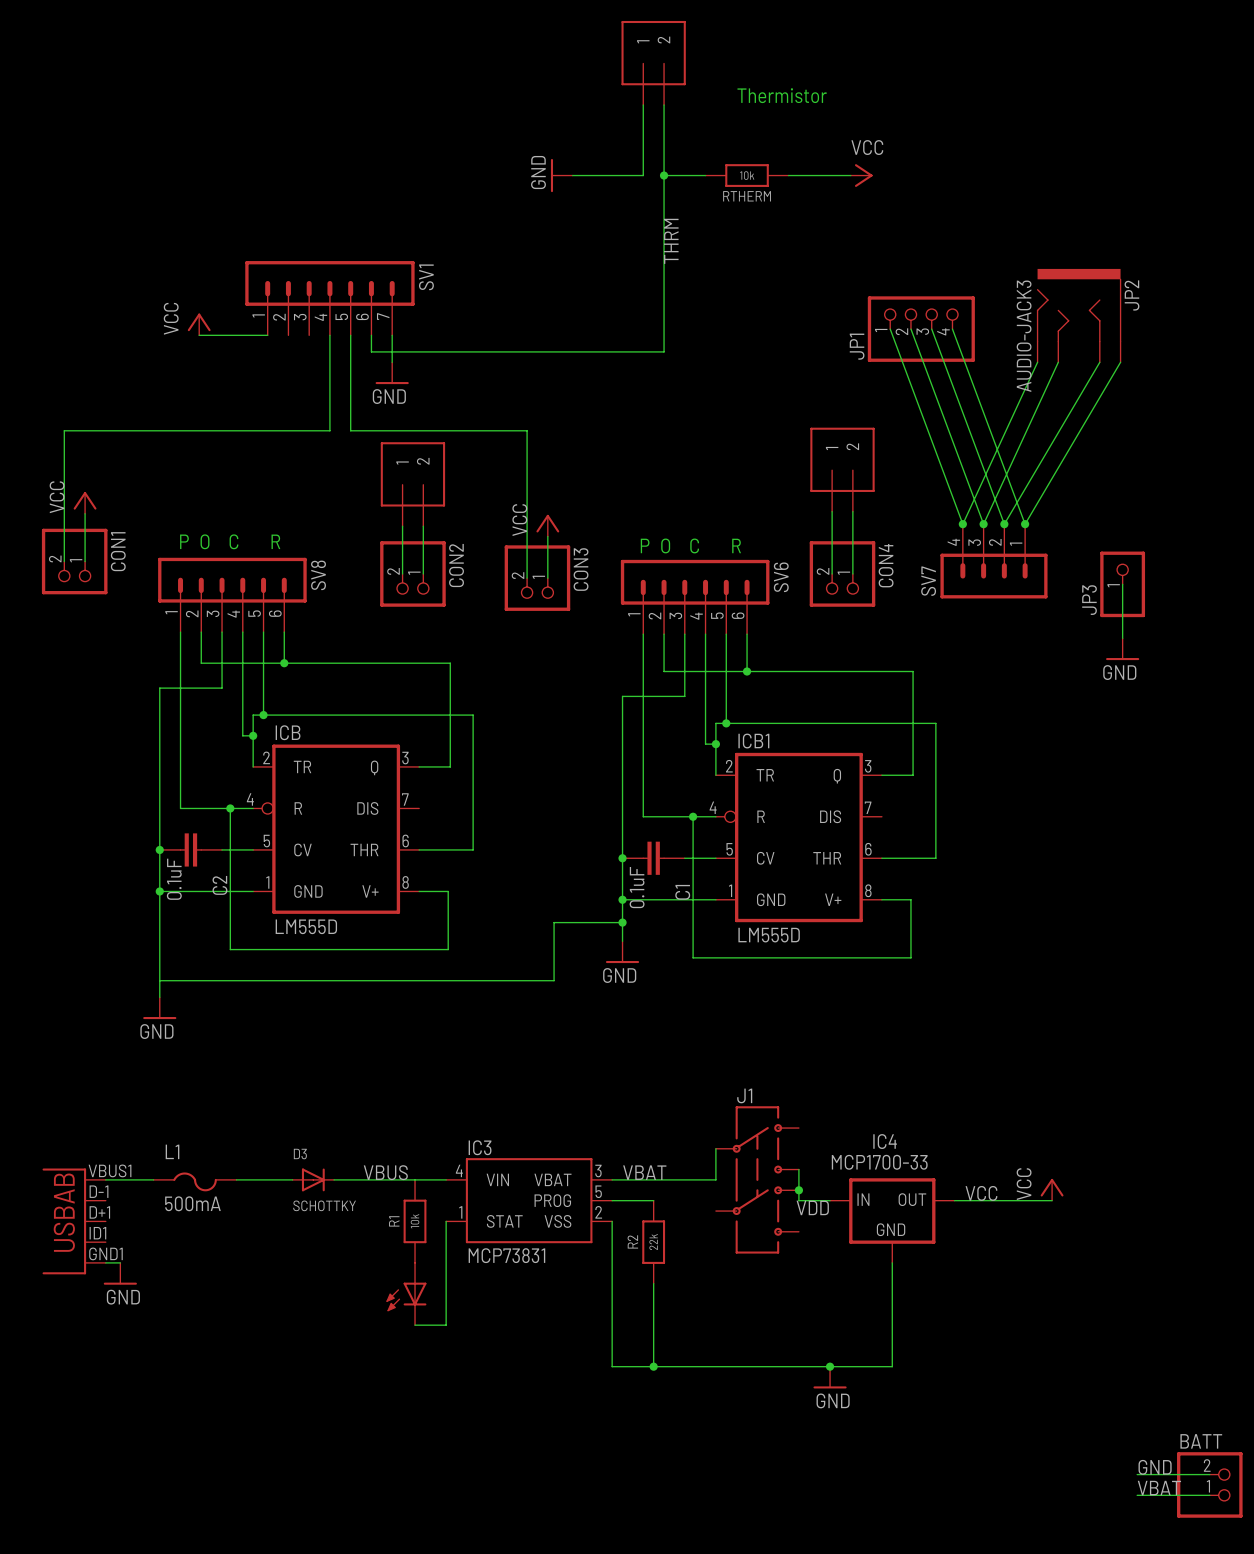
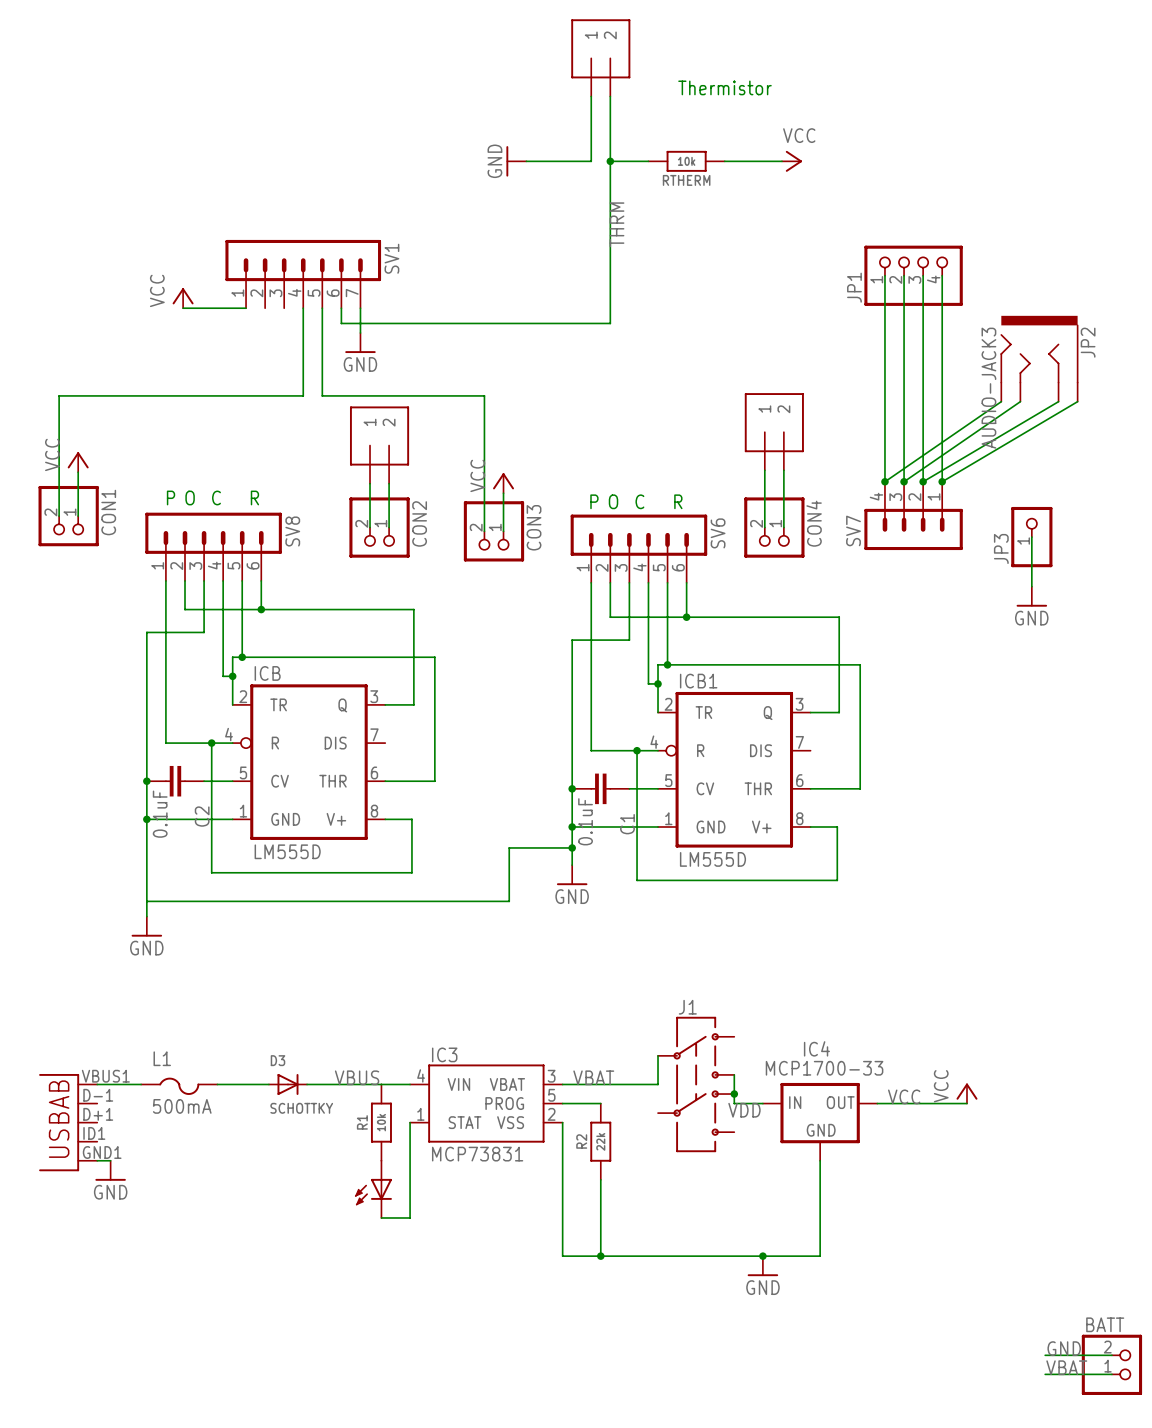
wire: none -> (884, 275) (884, 481) (1001, 401)
wire: none -> (904, 275) (904, 481) (1020, 401)
wire: none -> (923, 275) (923, 481) (1058, 401)
wire: none -> (942, 275) (942, 481) (1077, 401)
JP2 position: (1079, 315) -> (1039, 358)
wire: (890, 329) (962, 524) (1037, 362) -> none
wire: (910, 329) (983, 524) (1058, 362) -> none
JP1 position: (921, 329) -> (913, 275)
wire: (931, 329) (1004, 524) (1099, 362) -> none
wire: (952, 329) (1025, 524) (1120, 362) -> none

